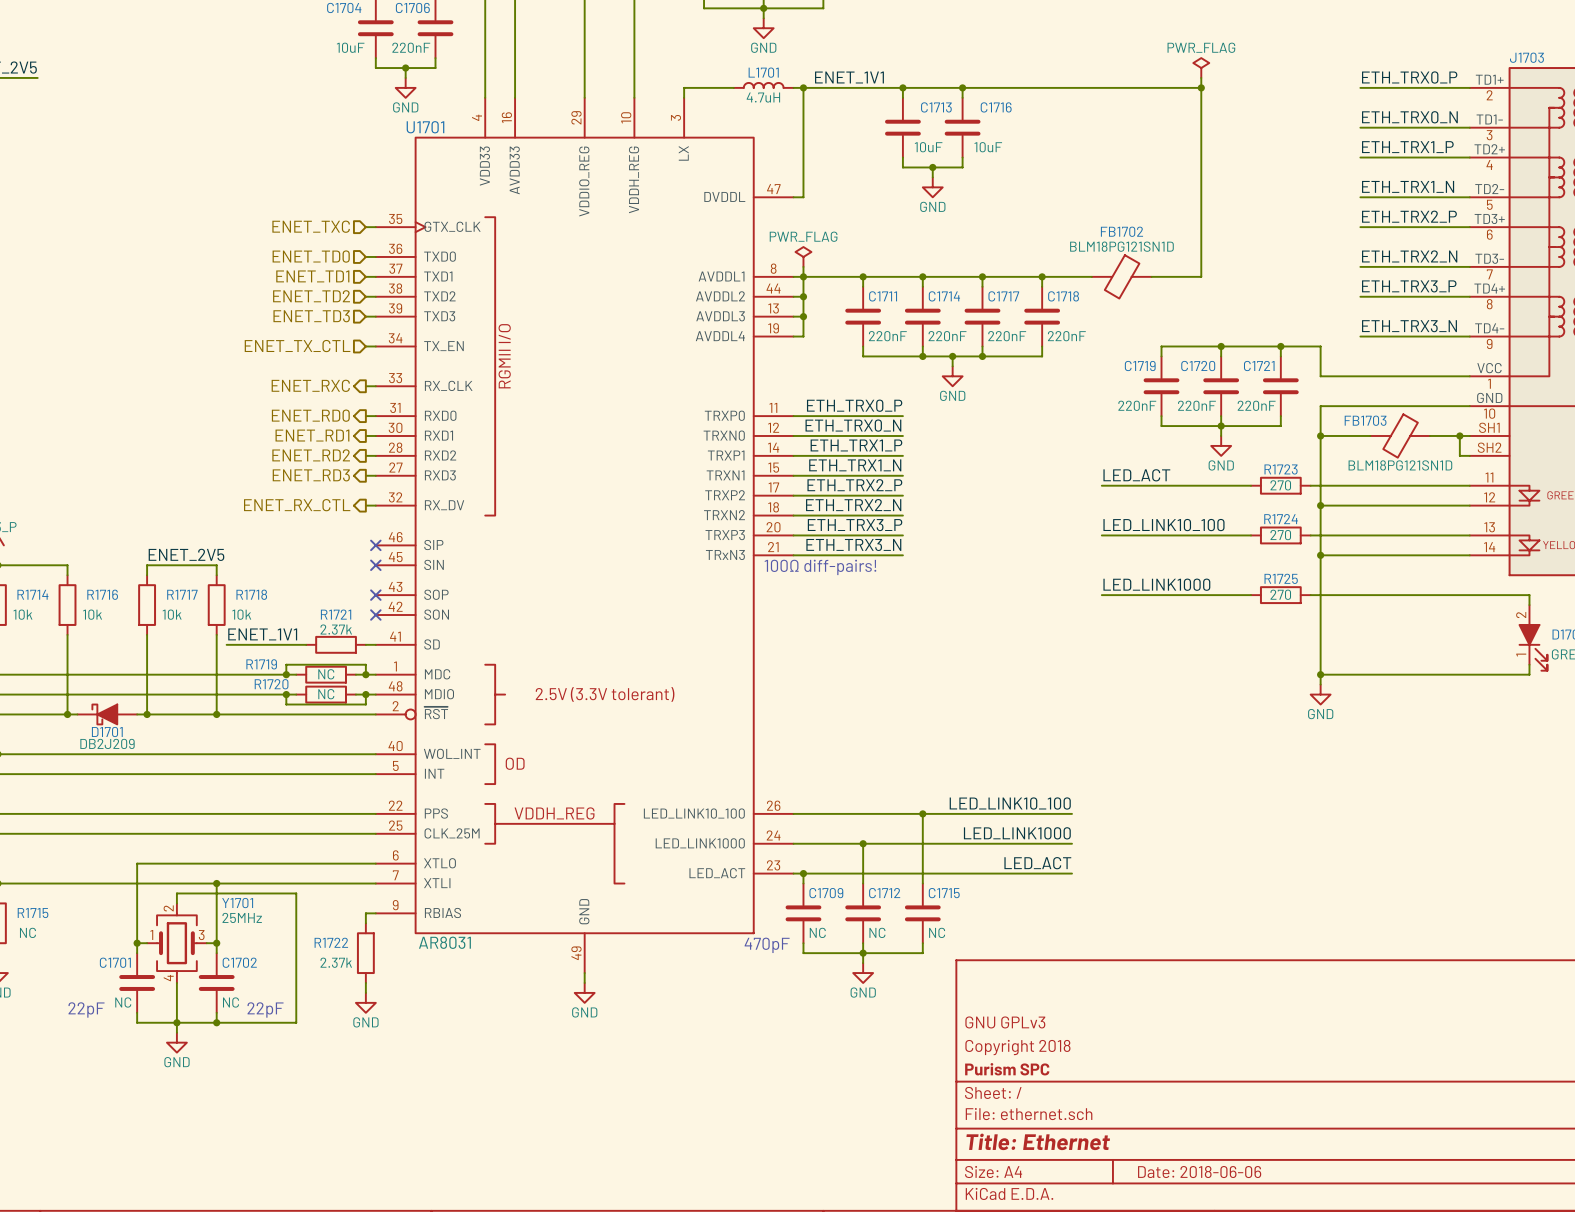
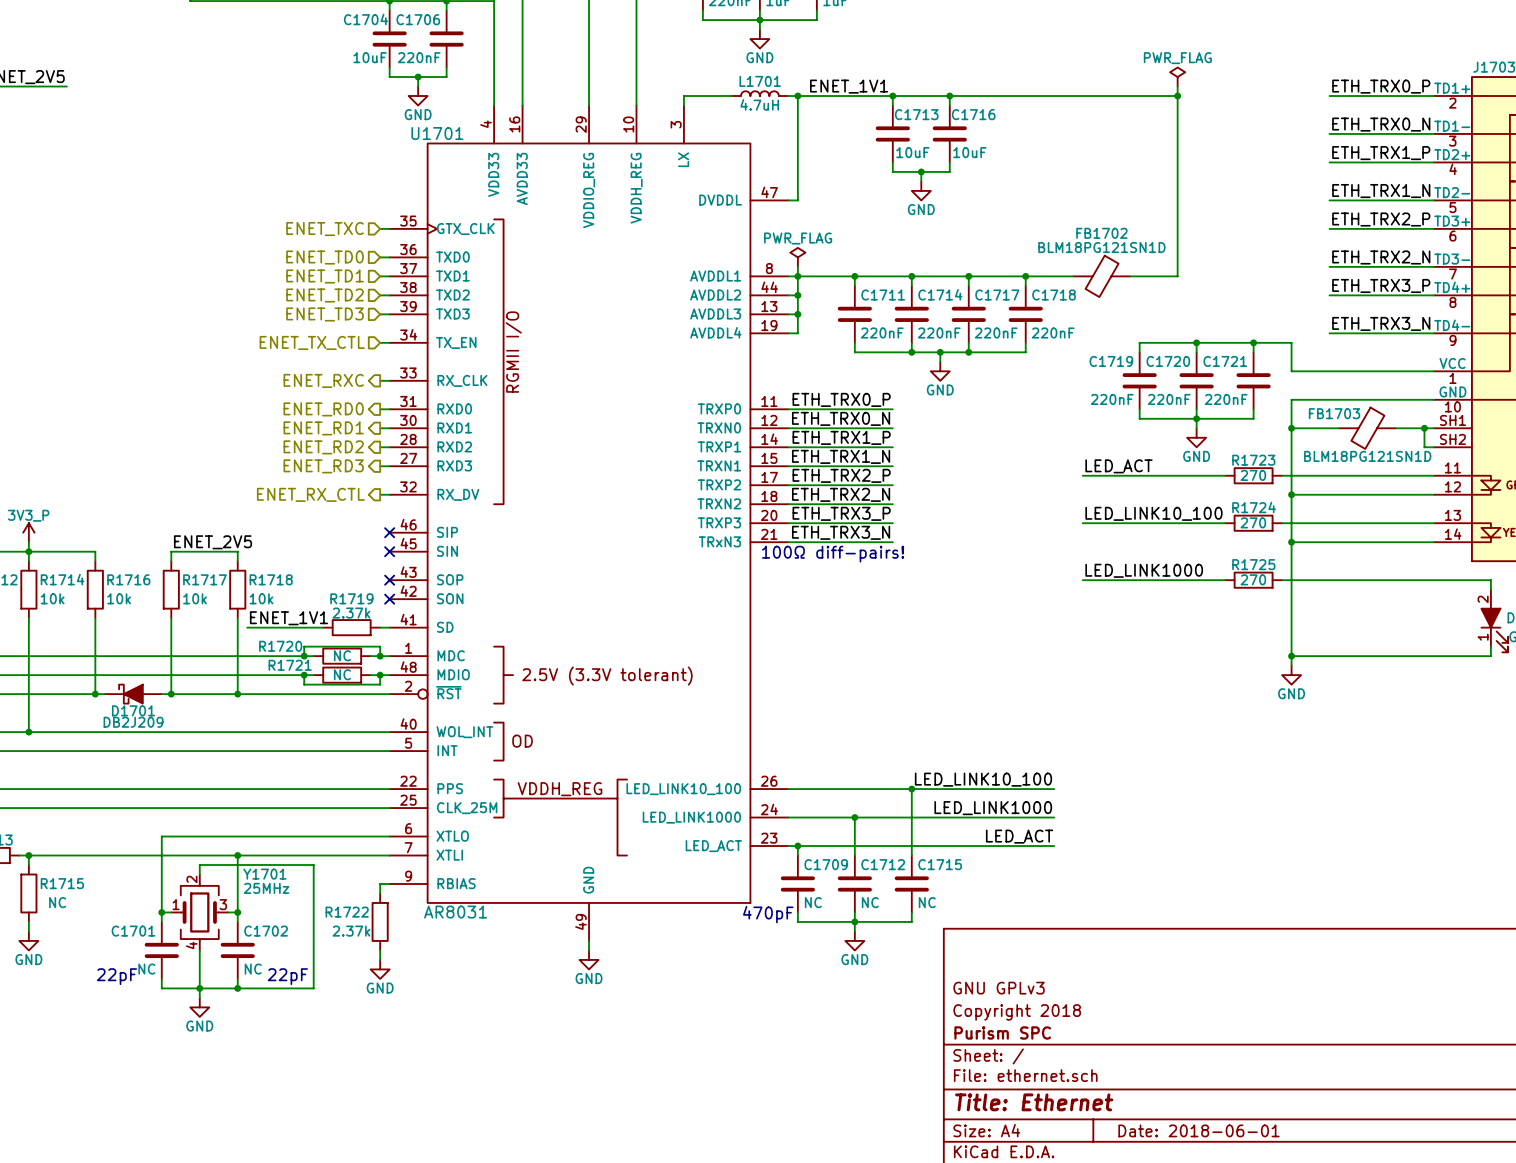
R1721 name: R1721 (336, 614) -> R1719 (351, 598)
R1719 name: R1719 (261, 664) -> R1720 (280, 646)
R1720 name: R1720 (271, 684) -> R1721 (290, 665)
title block: Date: 2018-06-06 (1199, 1172) -> Date: 2018-06-01 (1199, 1130)

